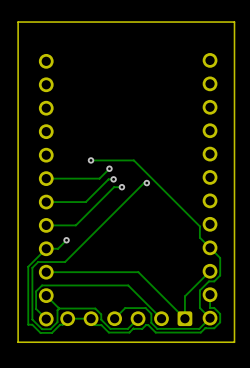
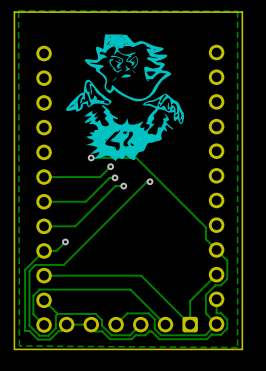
zone outline: none -> (18, 10) (19, 346) (237, 347) (237, 11) (18, 10)
drawing: none -> [66, 34, 185, 162]

